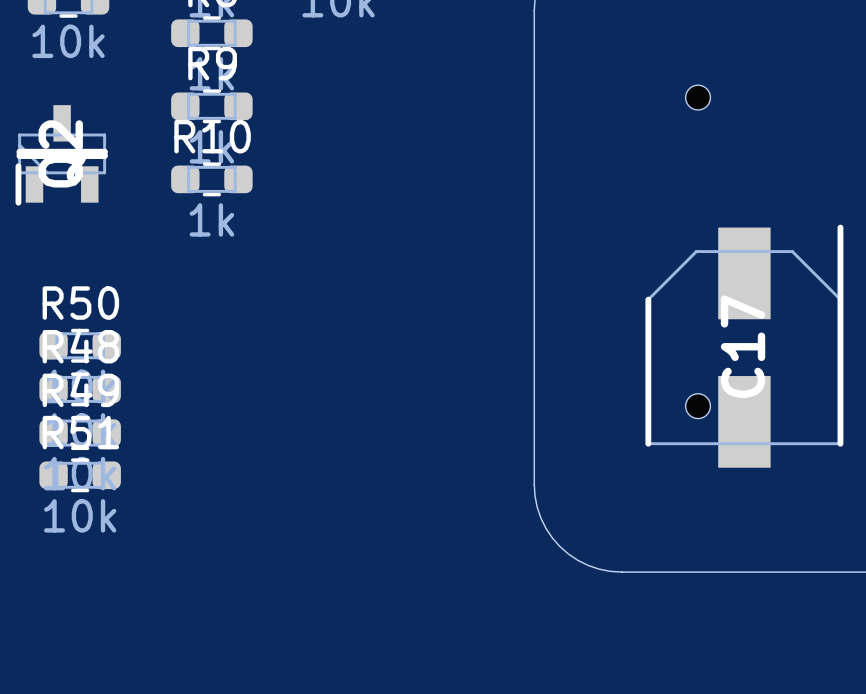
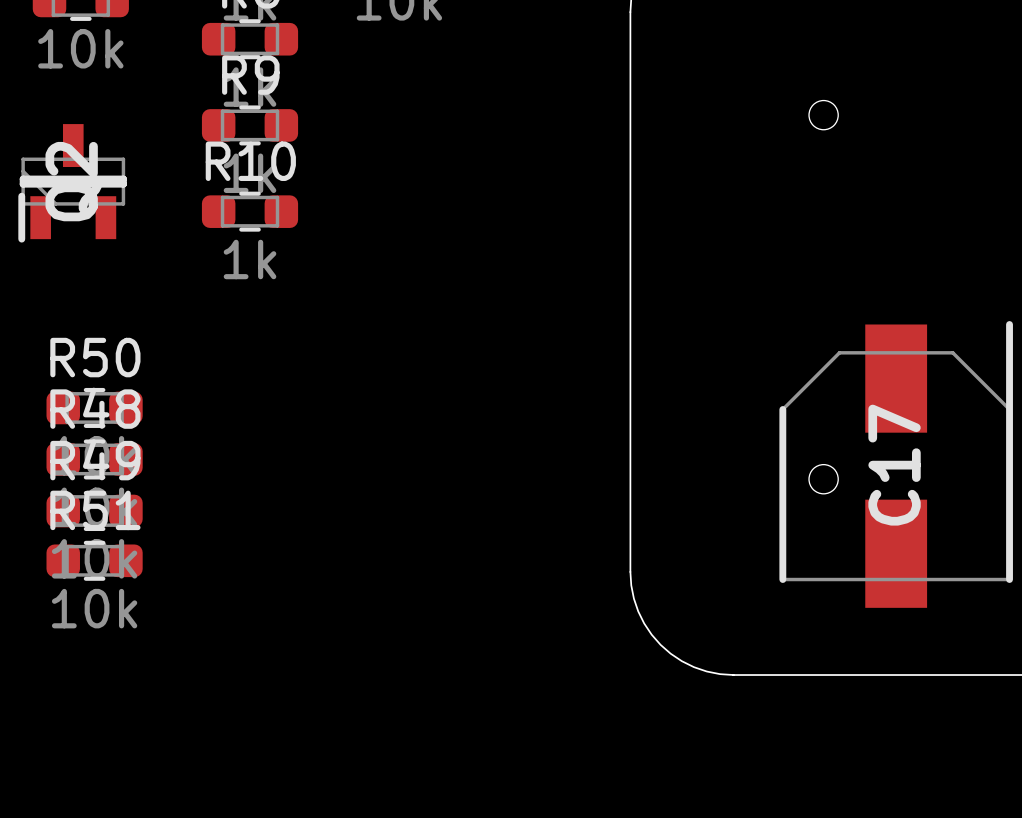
C17 position: (744, 346) -> (896, 464)

